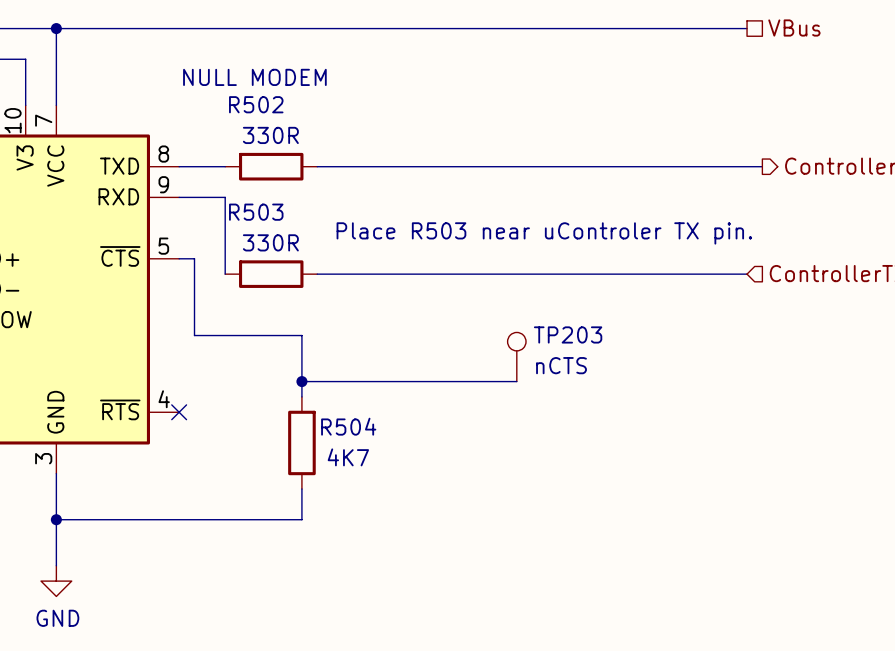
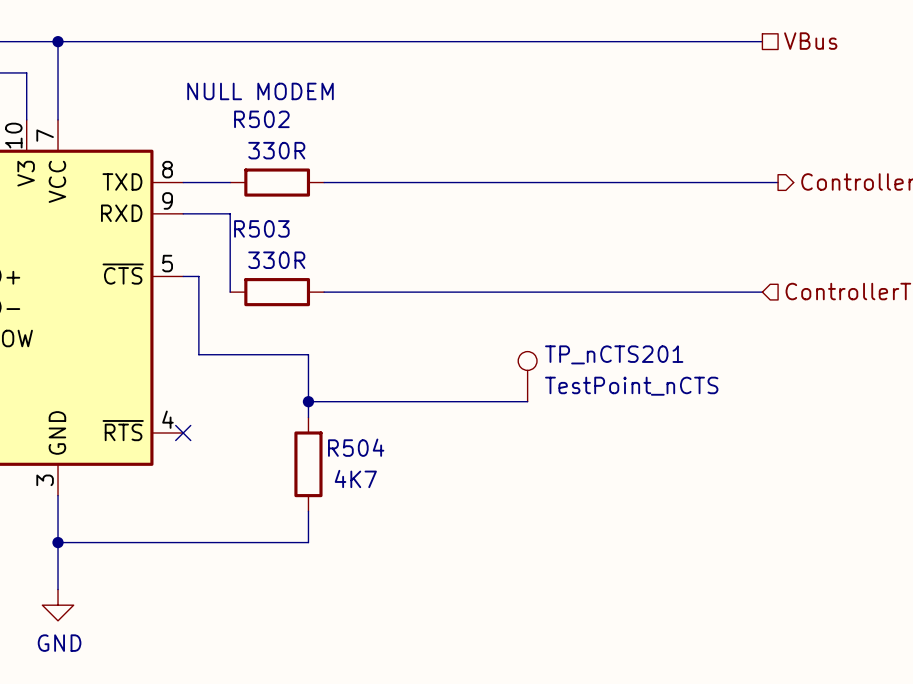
text: Place R503 near uControler TX pin. (544, 233) -> none
TP203 name: TP203 (568, 334) -> TP_nCTS201 (614, 354)
TP203 value: nCTS (561, 365) -> TestPoint_nCTS (631, 386)

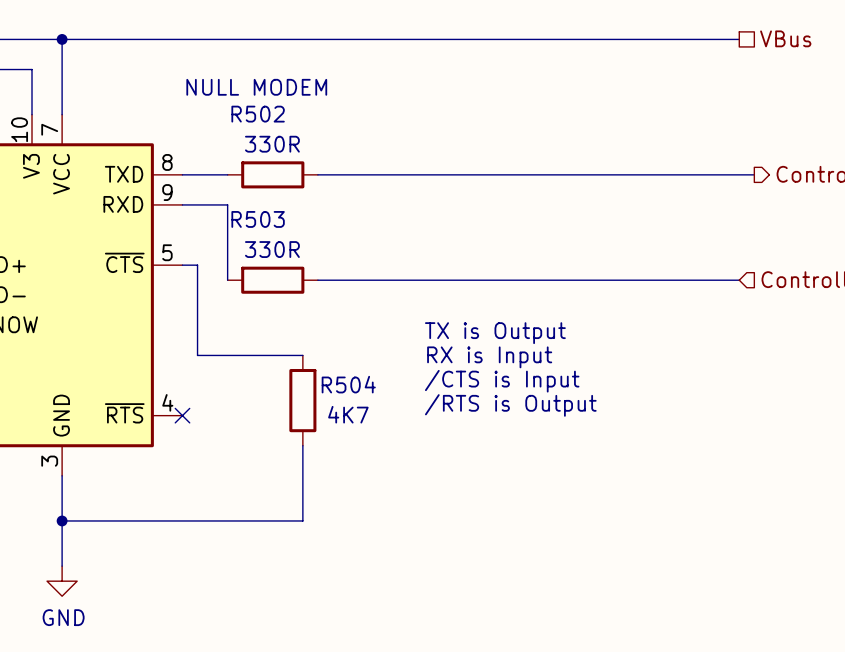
text: none -> TX is Output (495, 333)
wire: (198, 354) (308, 354) (308, 417) -> (197, 340) (197, 355) (302, 355)
text: none -> RX is Input (489, 357)
TP_nCTS201: TestPoint_nCTS (527, 376) -> none
text: none -> /CTS is Input (502, 381)
wire: (308, 401) (527, 401) -> none
junction: (308, 401) -> none
text: none -> /RTS is Output (510, 405)
wire: none -> (302, 445) (302, 490)
R504 position: (308, 464) -> (302, 400)

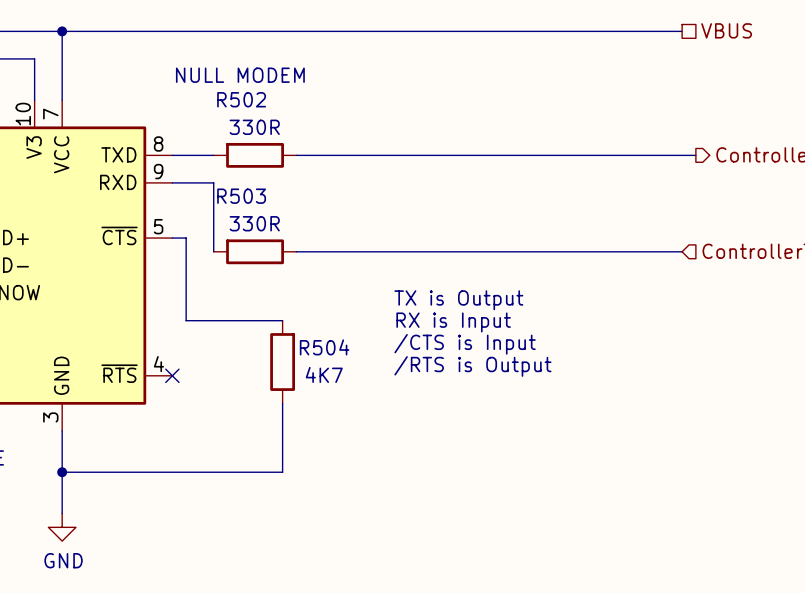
hierarchical label: VBus (785, 38) -> VBUS (726, 30)

